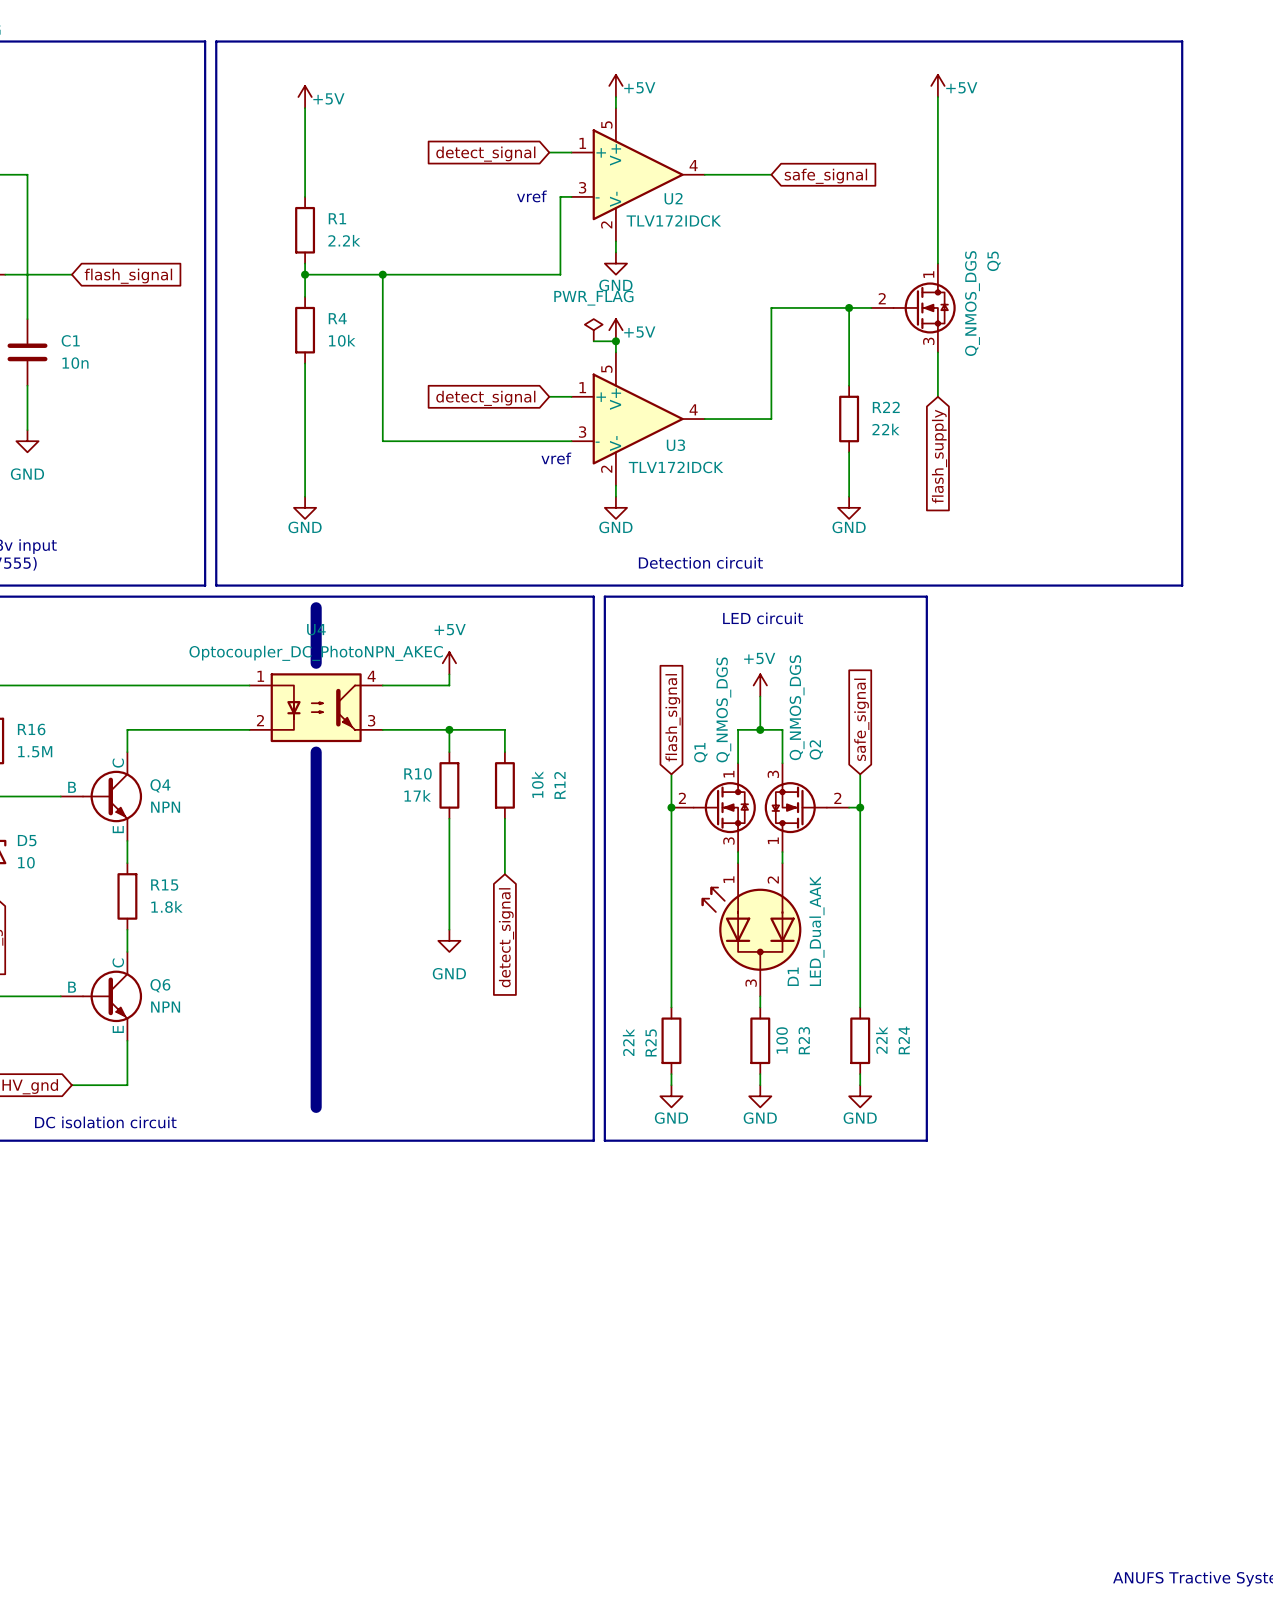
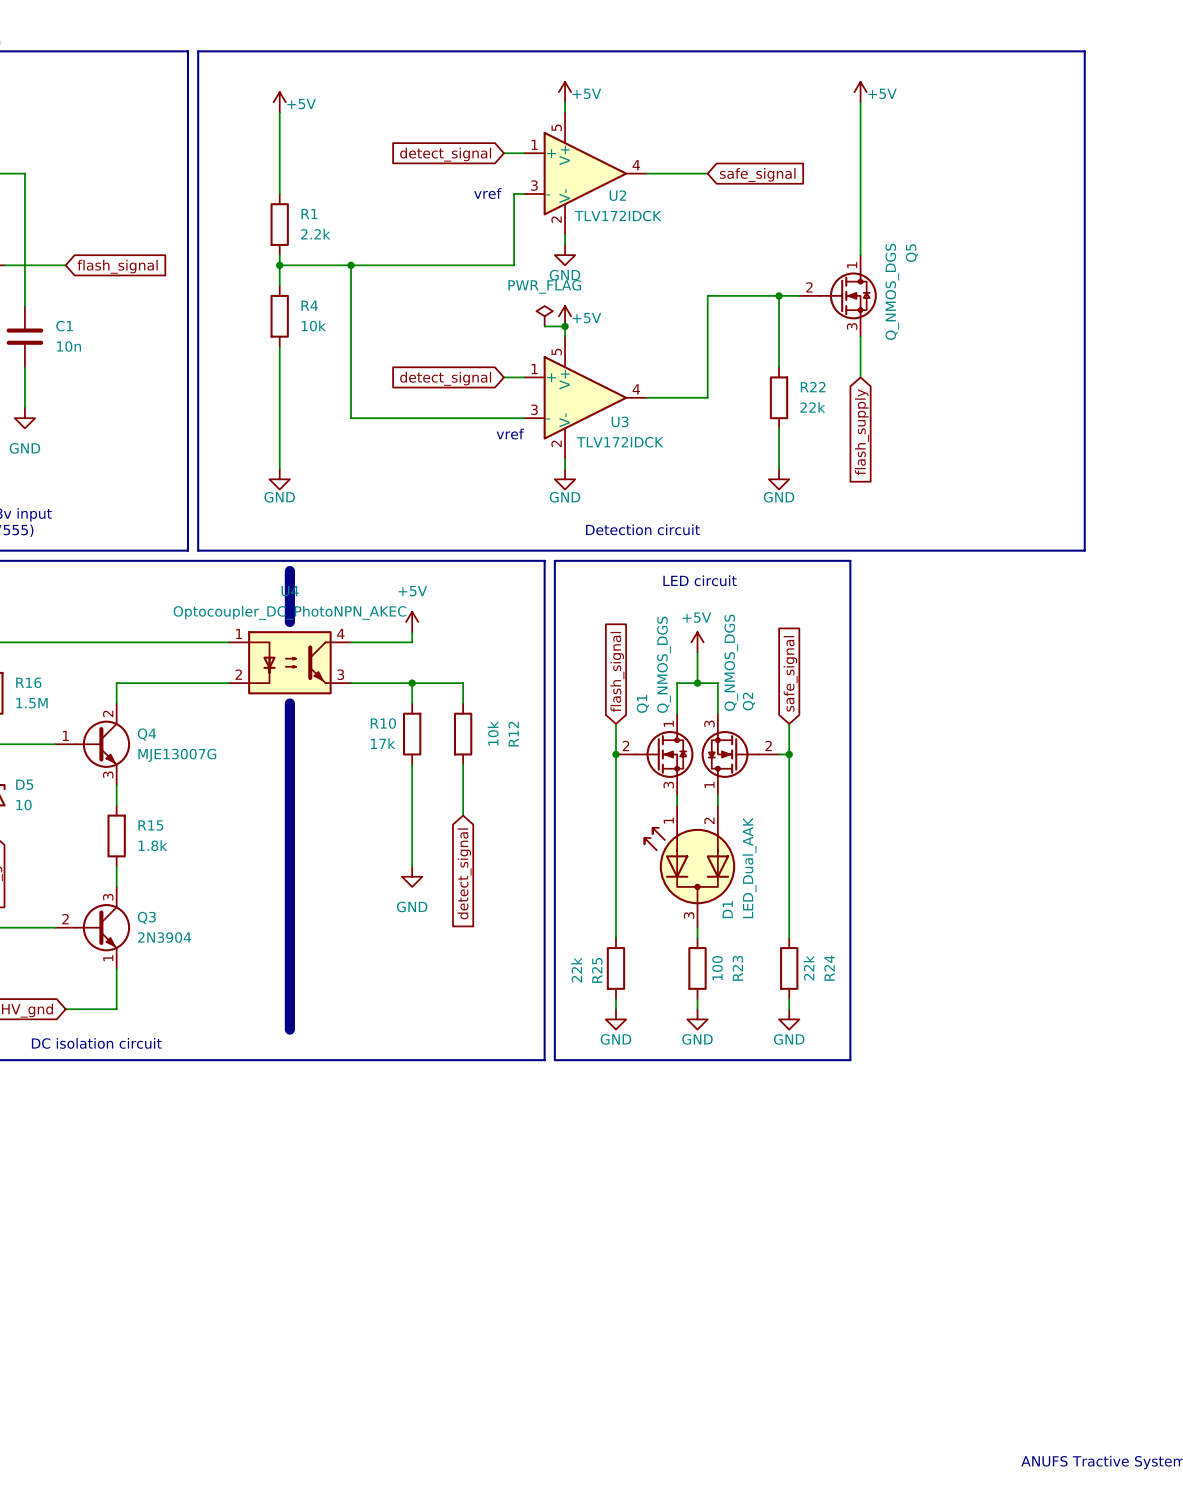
Q4 symbol: [60, 752, 143, 841] -> [55, 703, 131, 786]
Q4 value: NPN (165, 807) -> MJE13007G (177, 755)
Q6: NPN (101, 996) -> none
Q3: none -> 2N3904 (92, 927)

